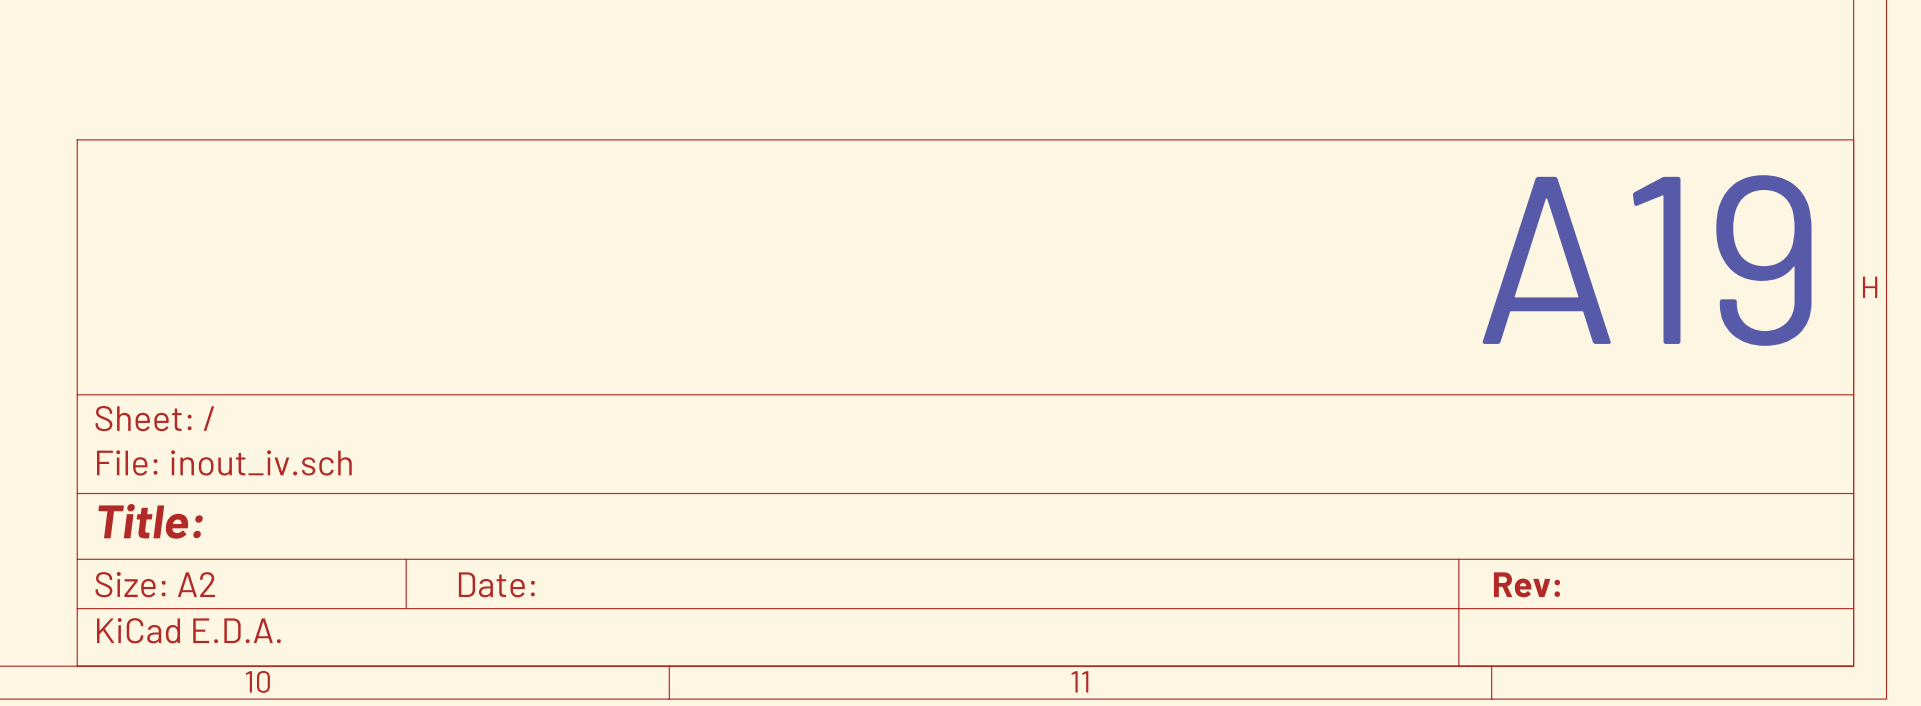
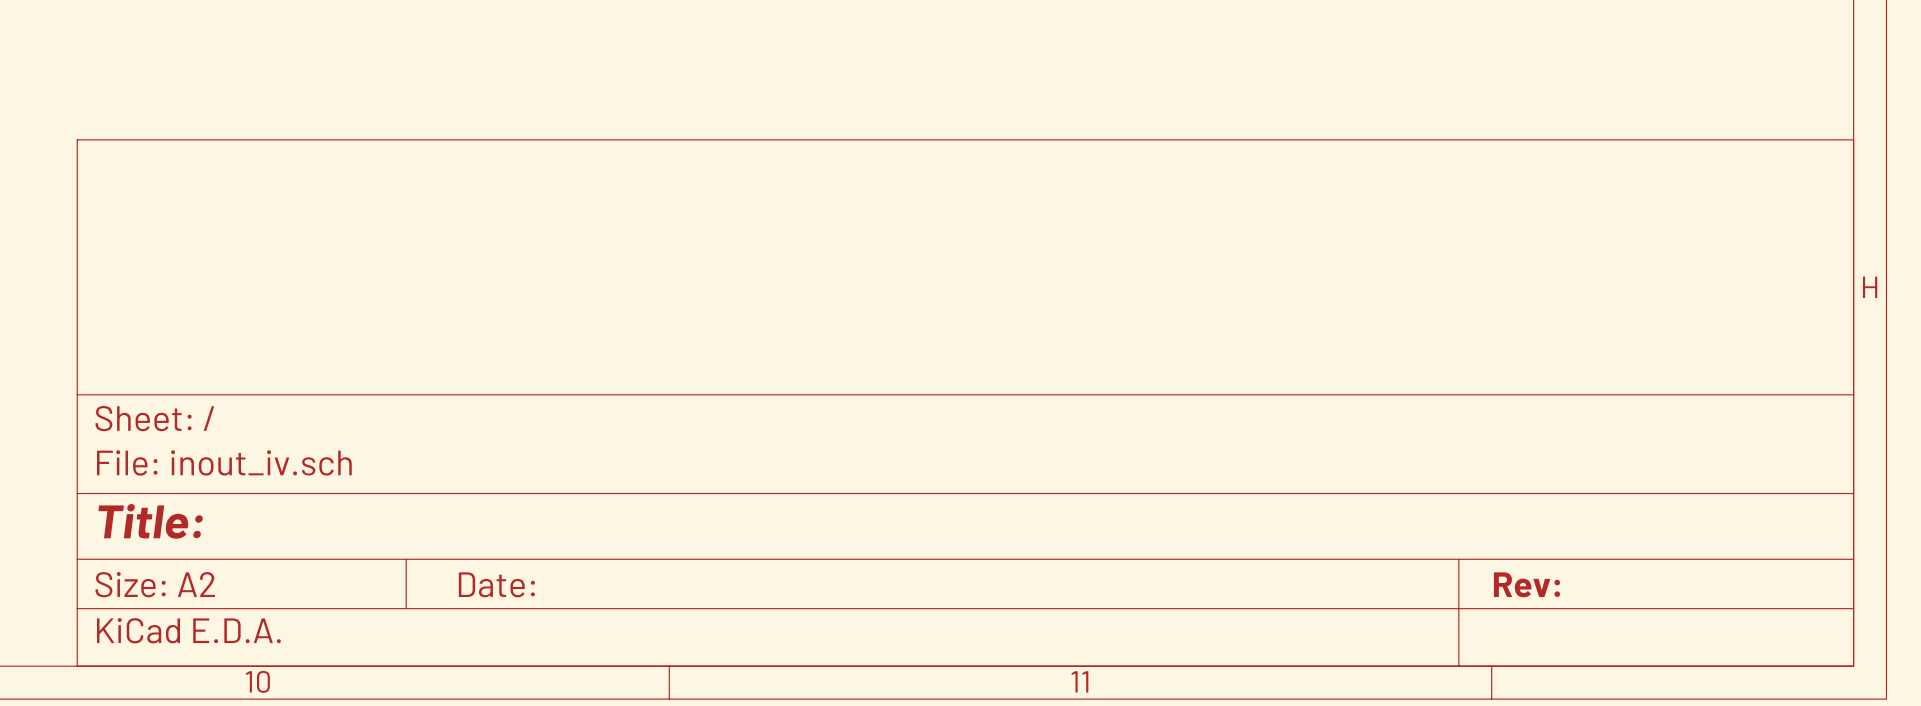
text: A19 (1646, 260) -> none

